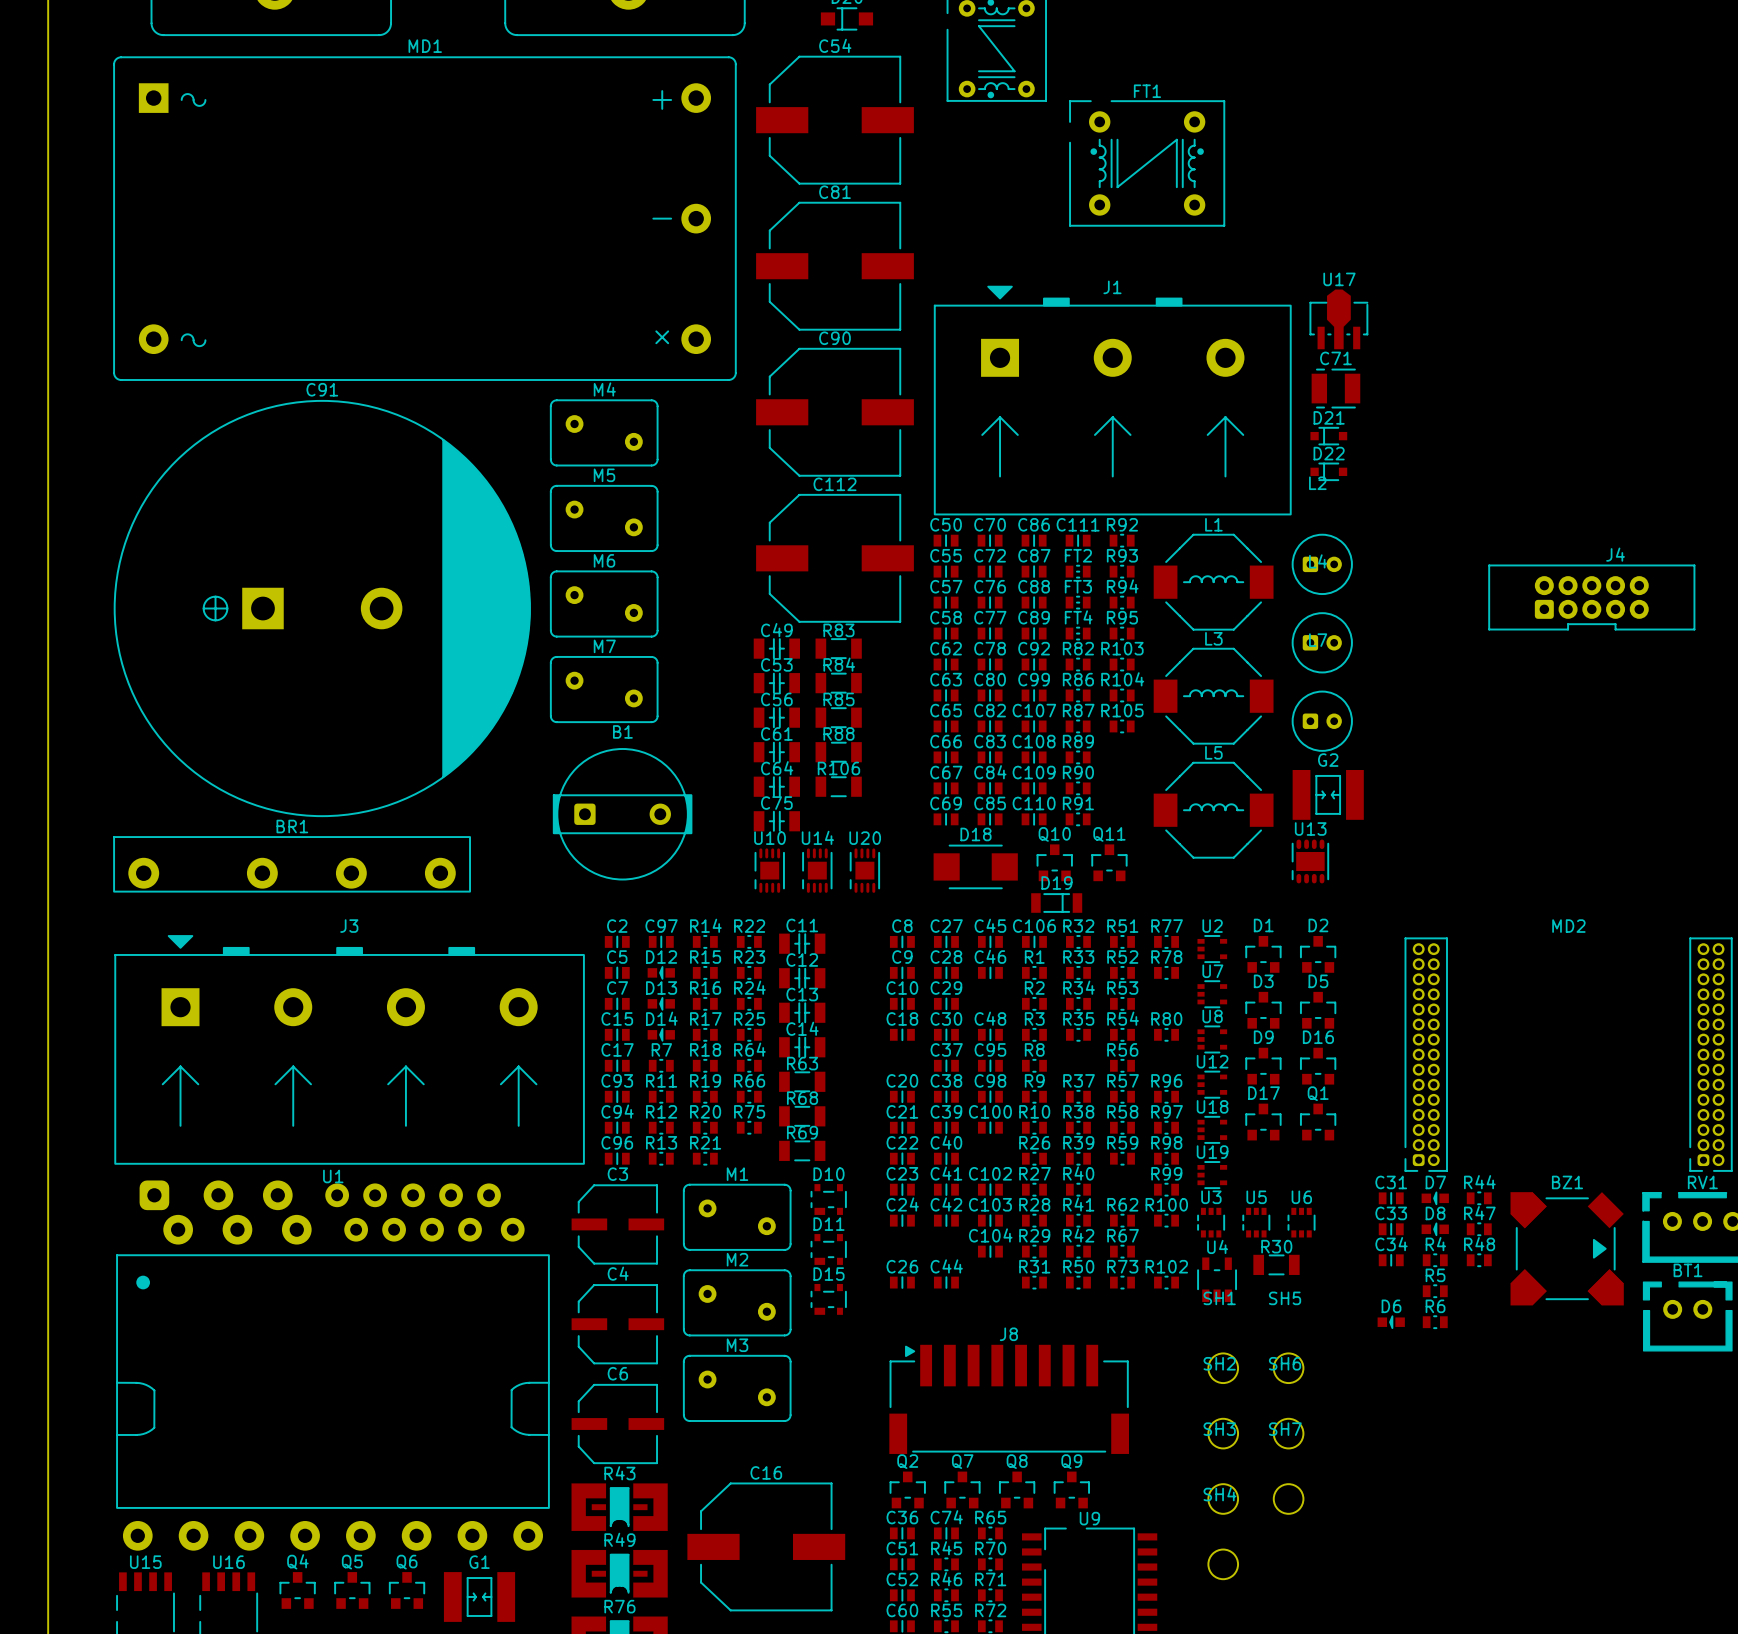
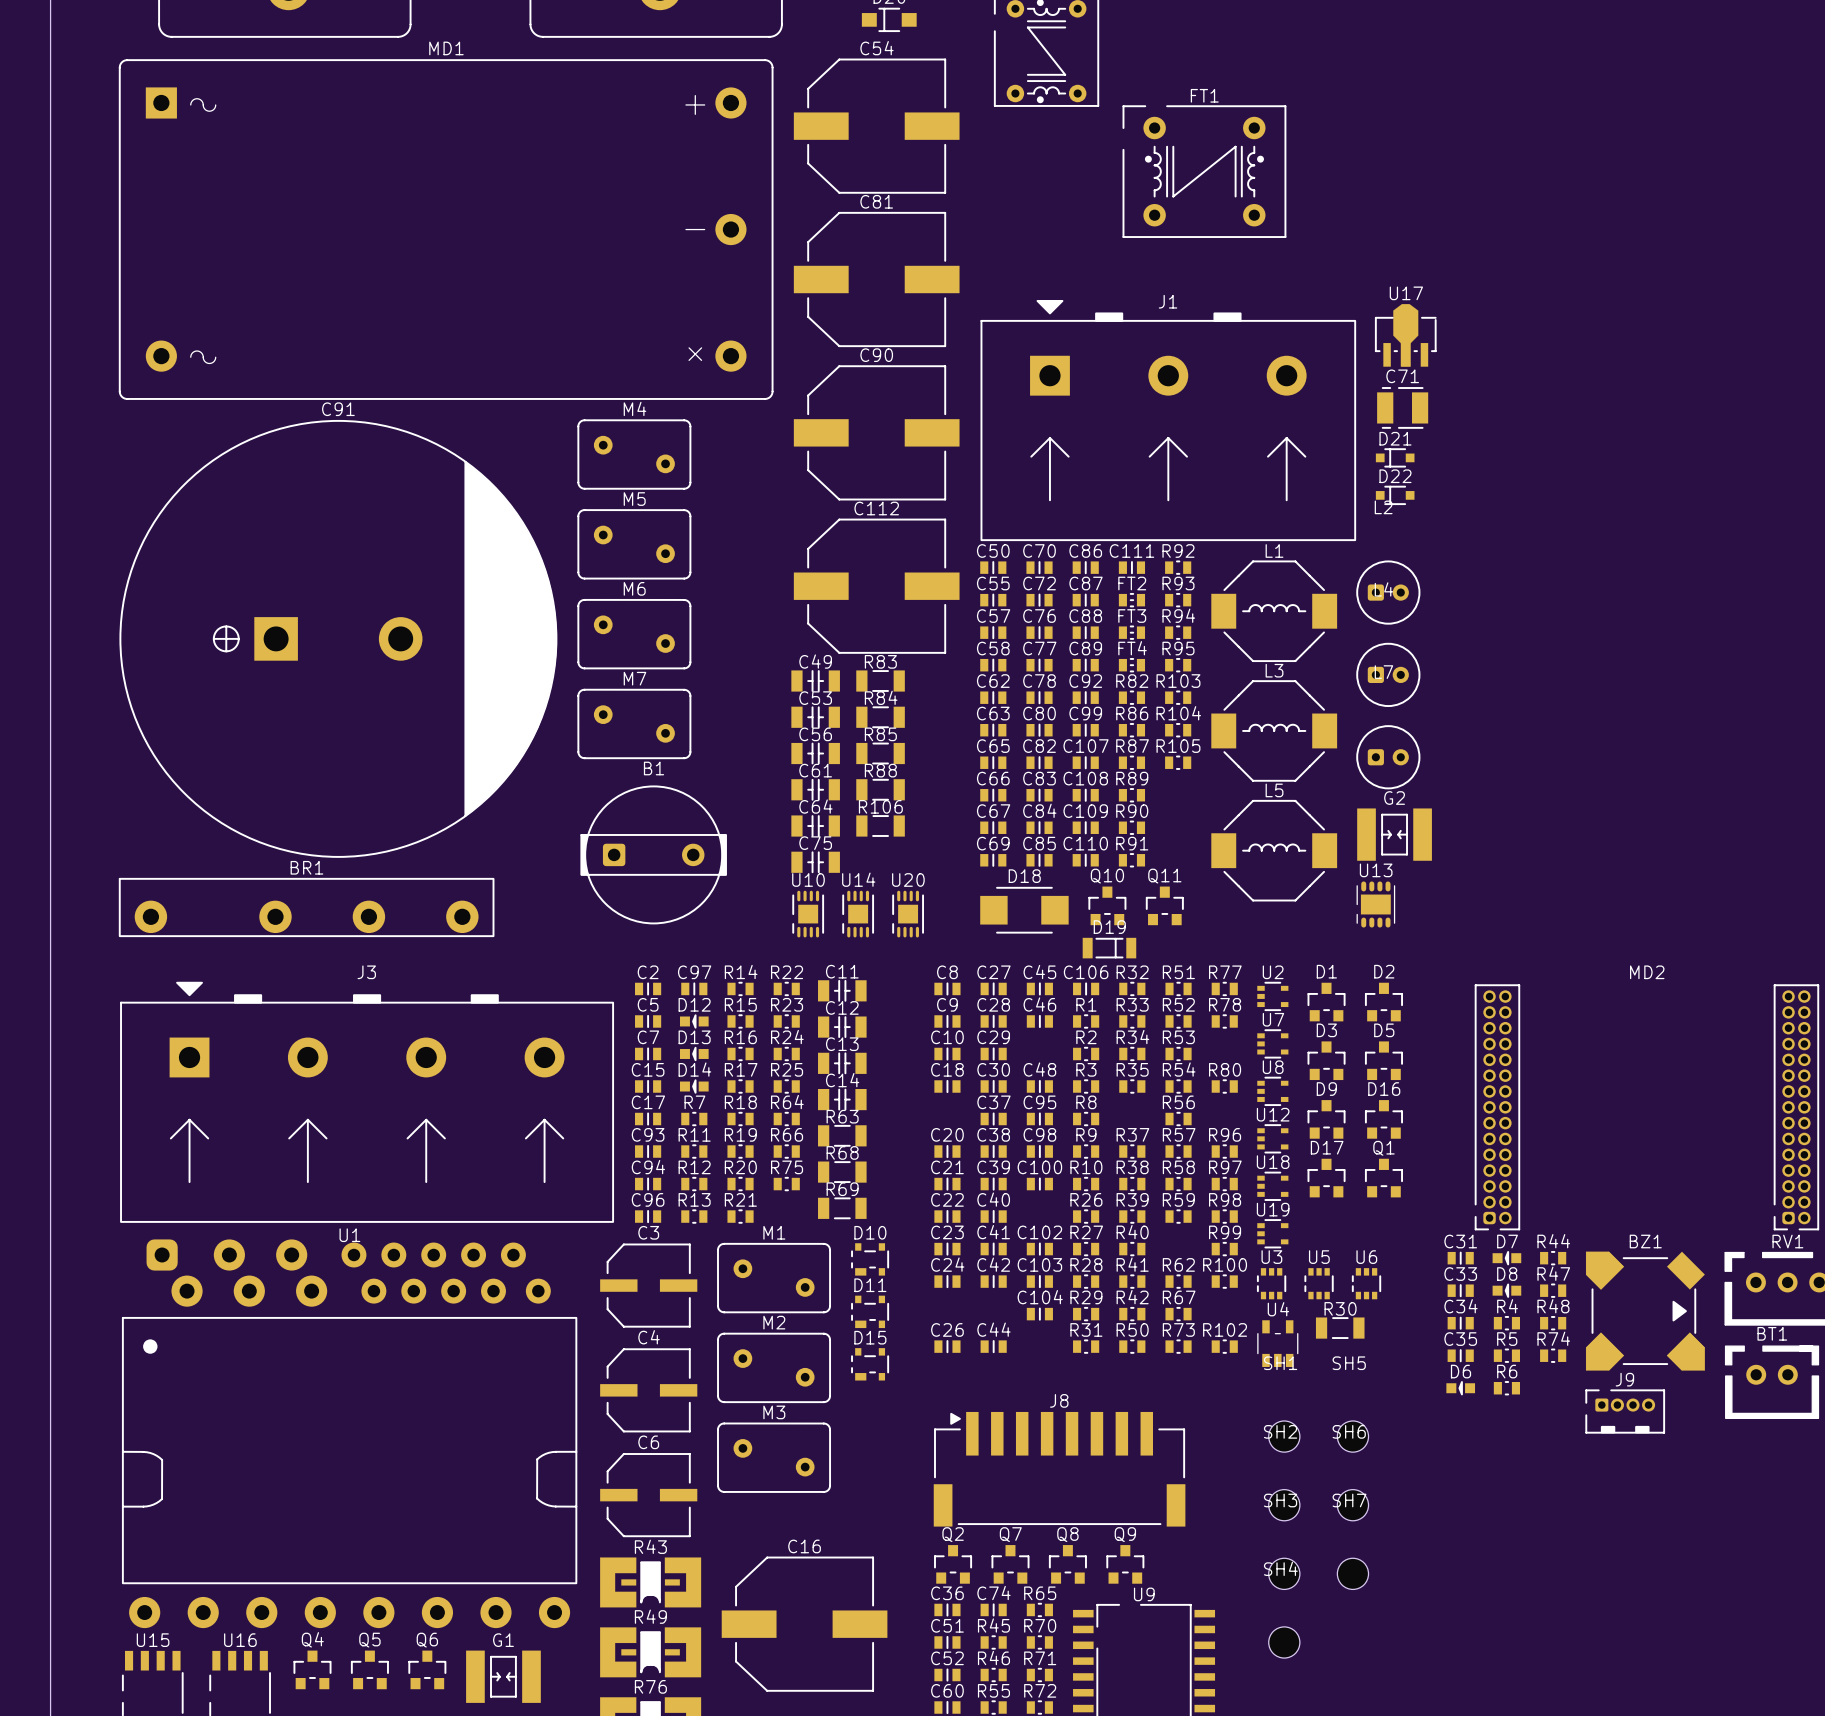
J4: (1591, 597) -> none
C35: none -> (1460, 1355)
R74: none -> (1553, 1355)
J9: none -> (1625, 1411)

